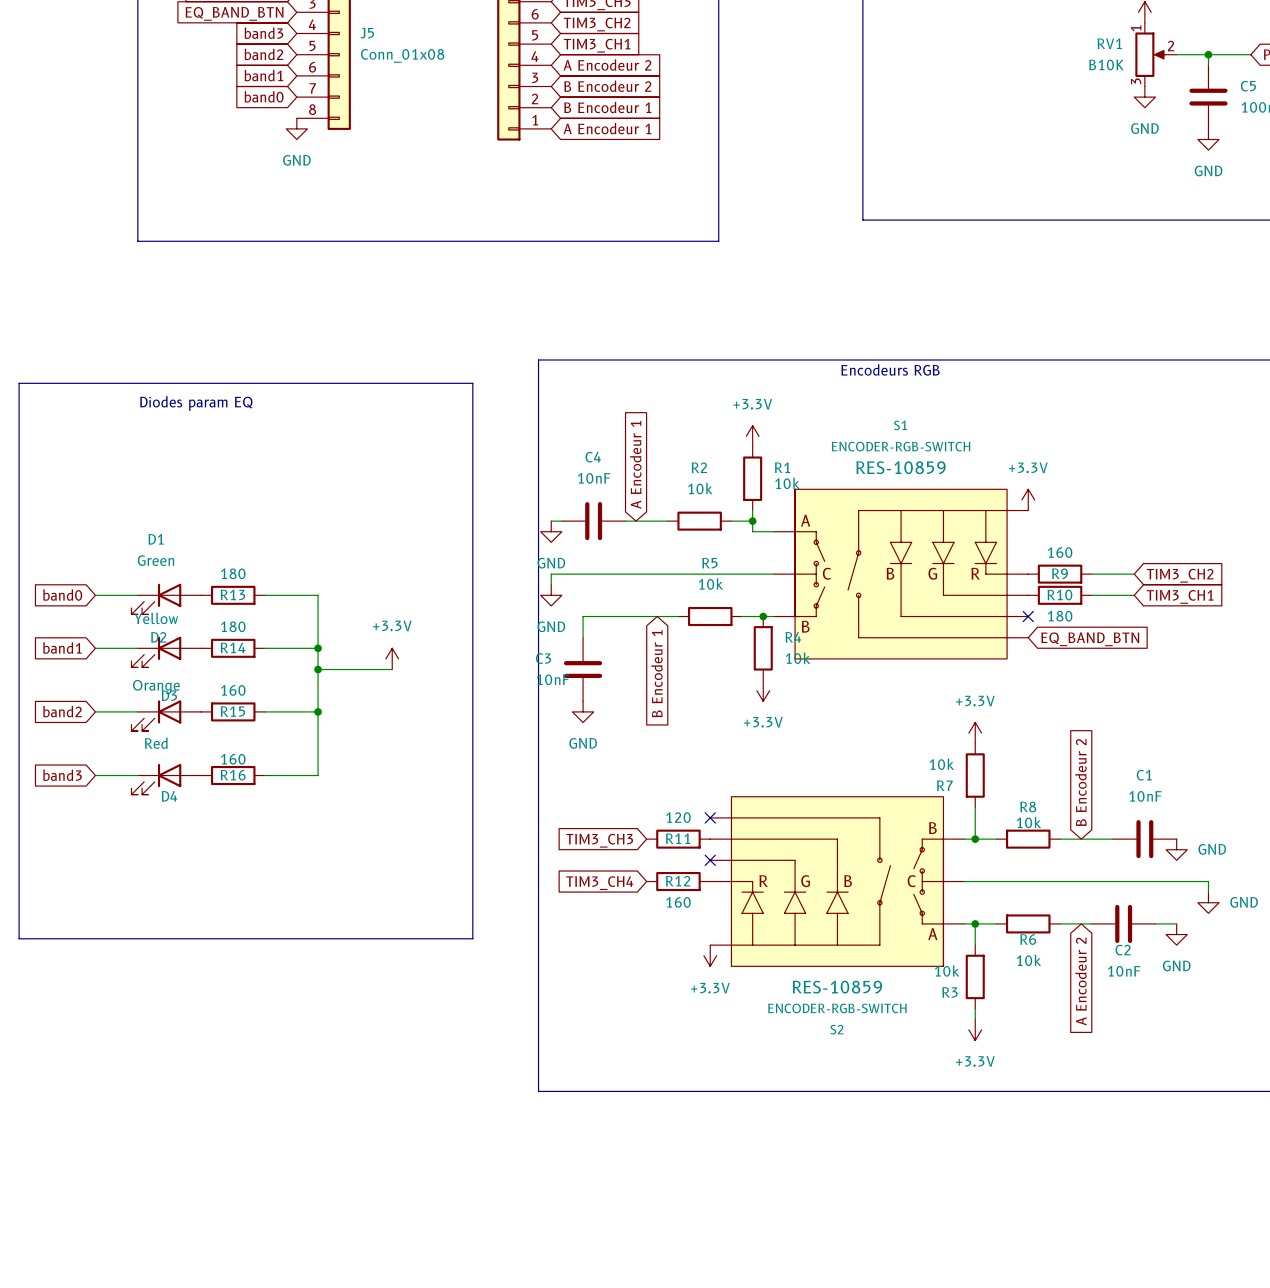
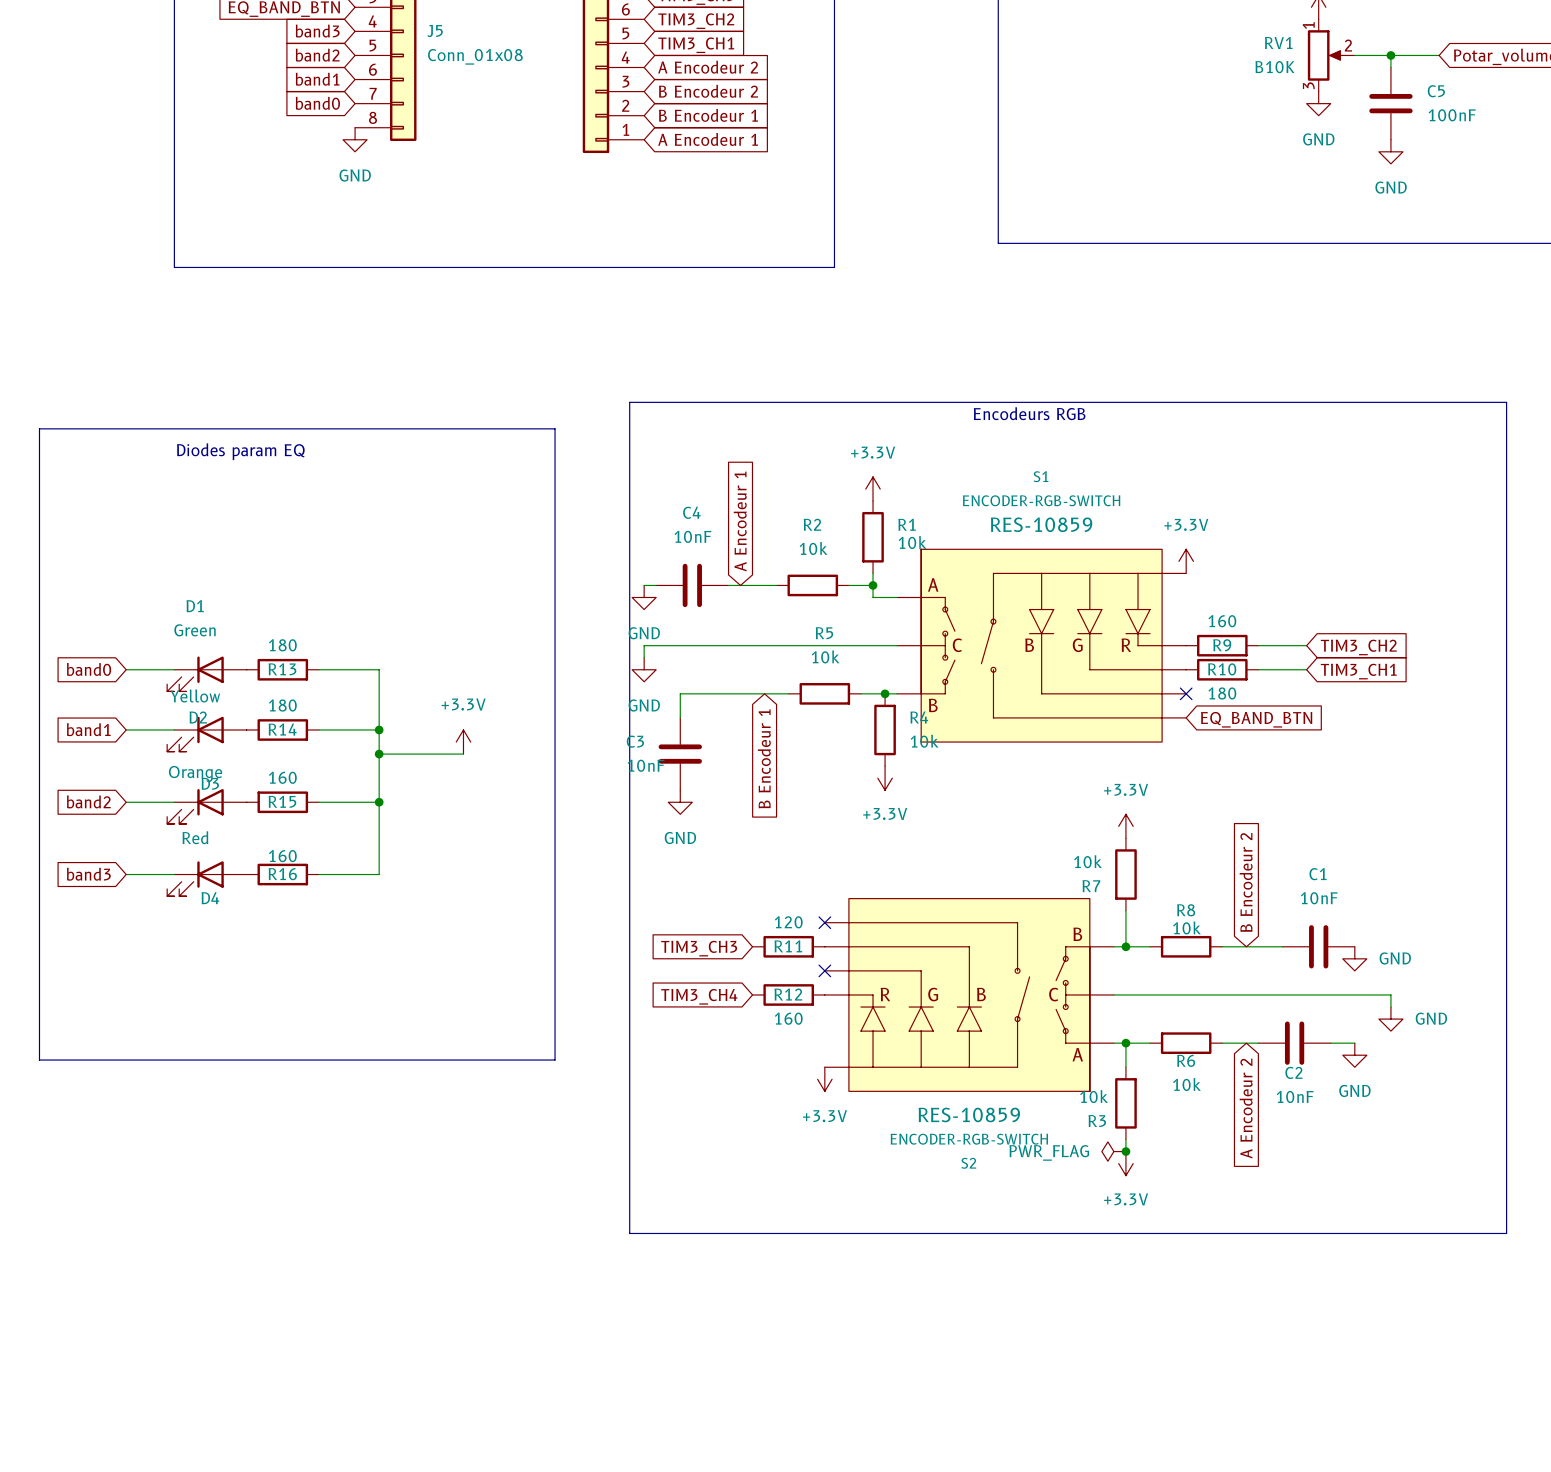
power symbol: none -> PWR_FLAG (1113, 1151)
junction: none -> (1125, 1151)

